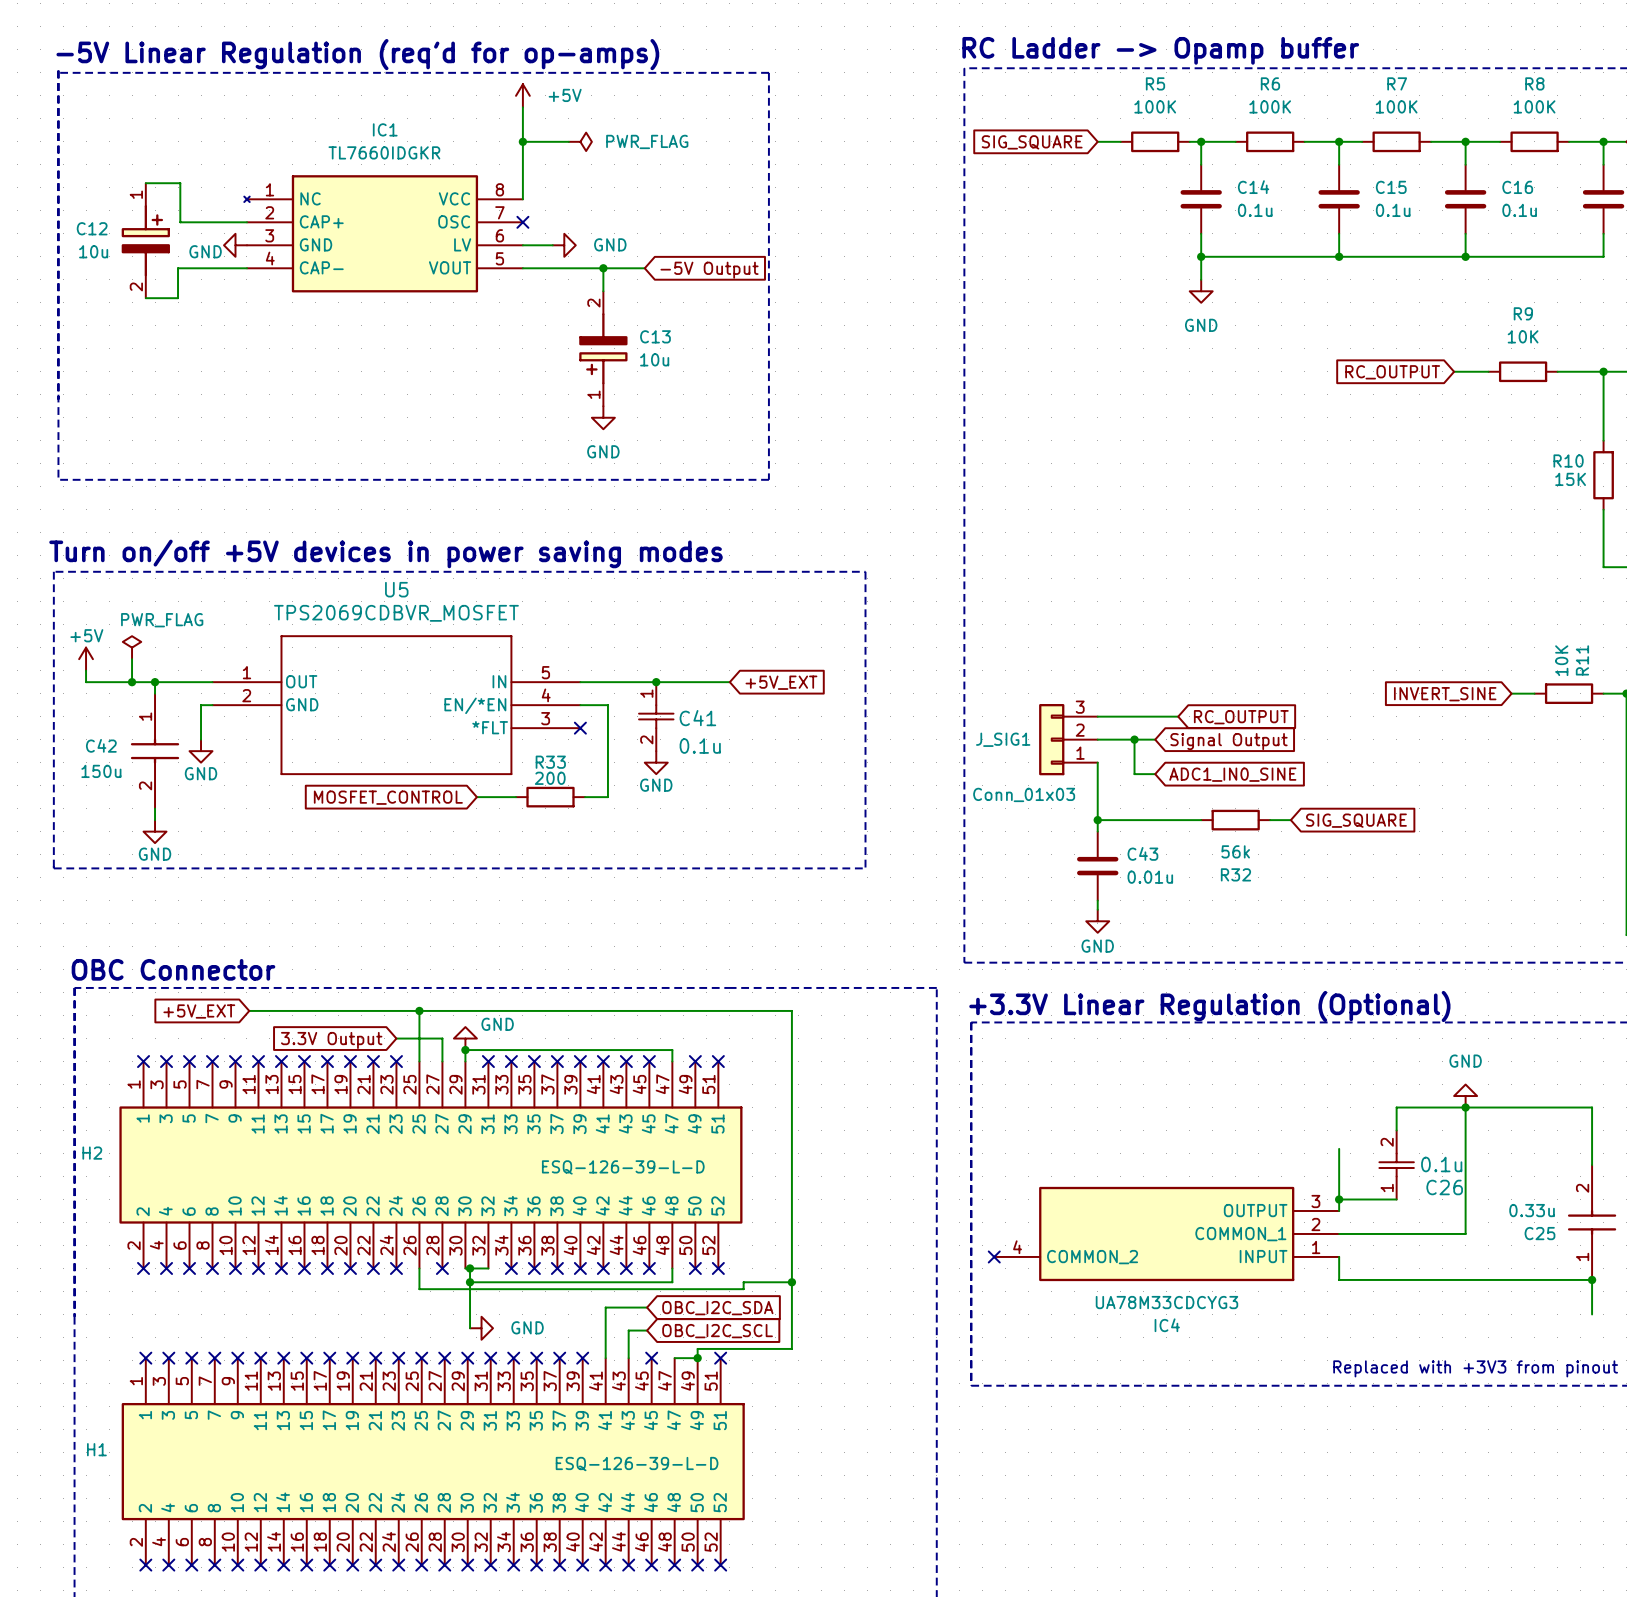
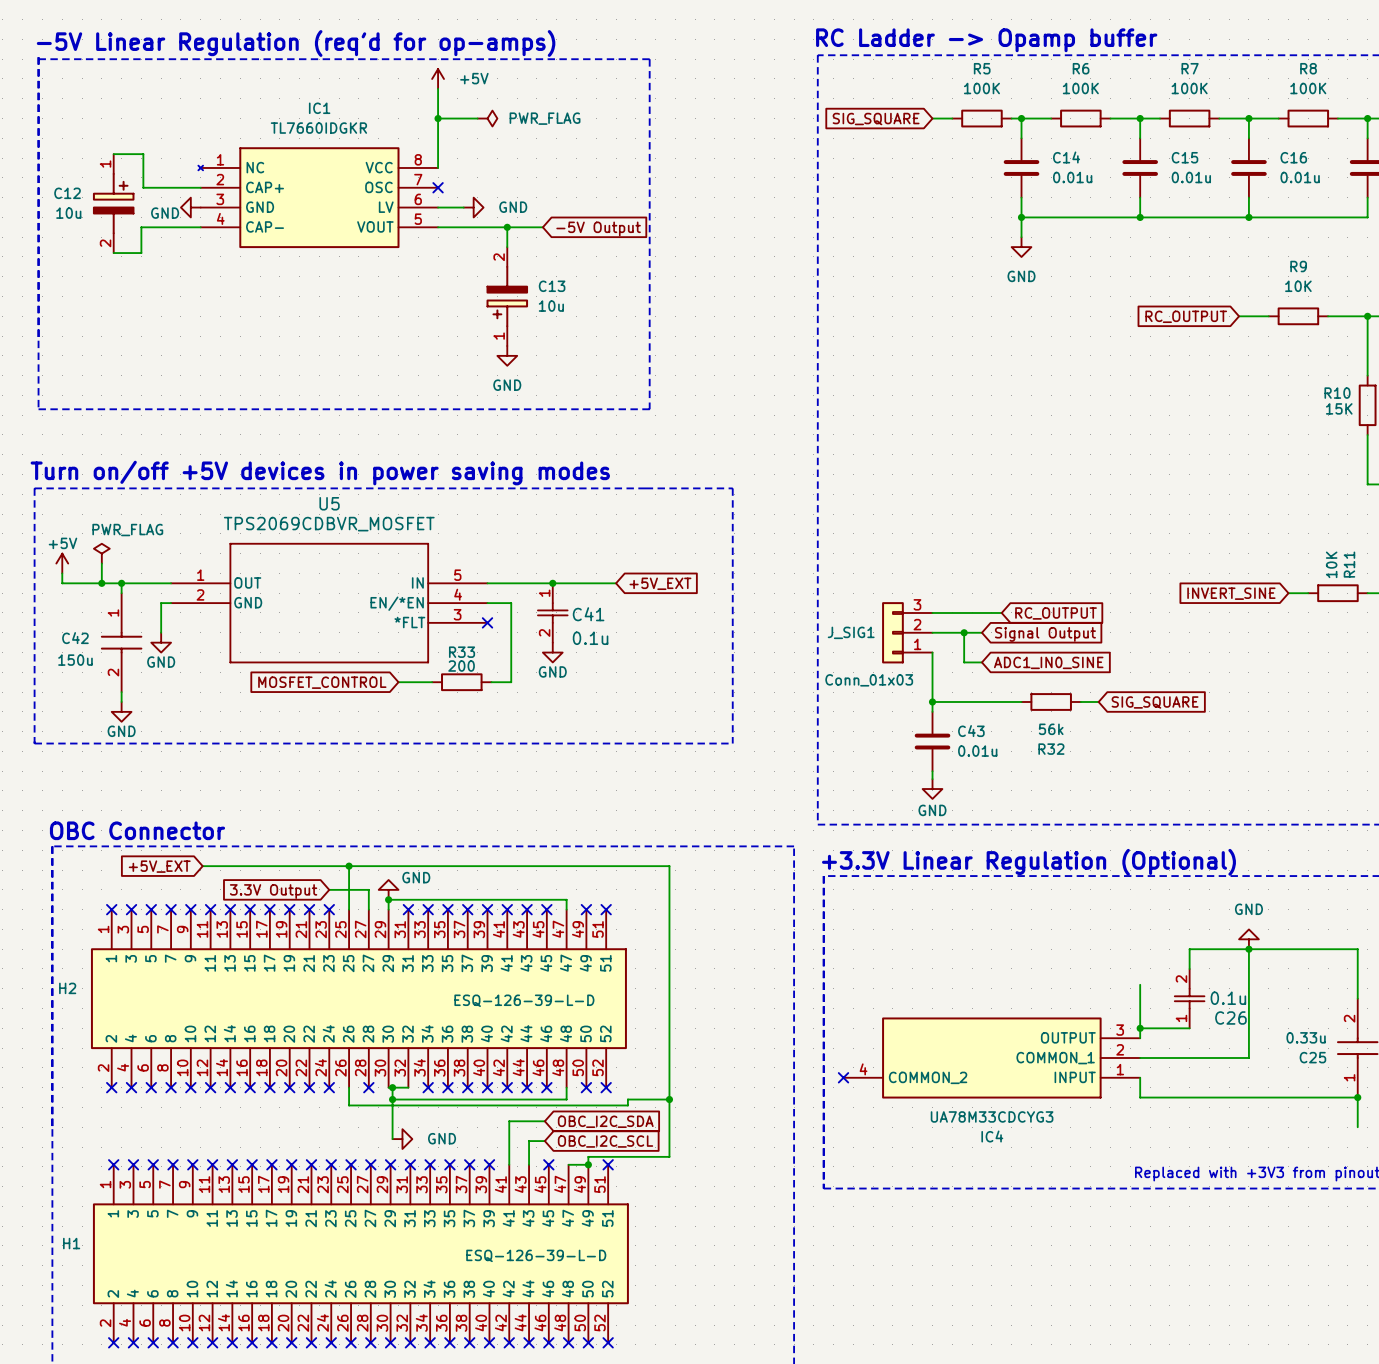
C14 value: 0.1u (1255, 210) -> 0.01u (1072, 177)
C15 value: 0.1u (1393, 210) -> 0.01u (1191, 177)
C16 value: 0.1u (1519, 210) -> 0.01u (1300, 177)

